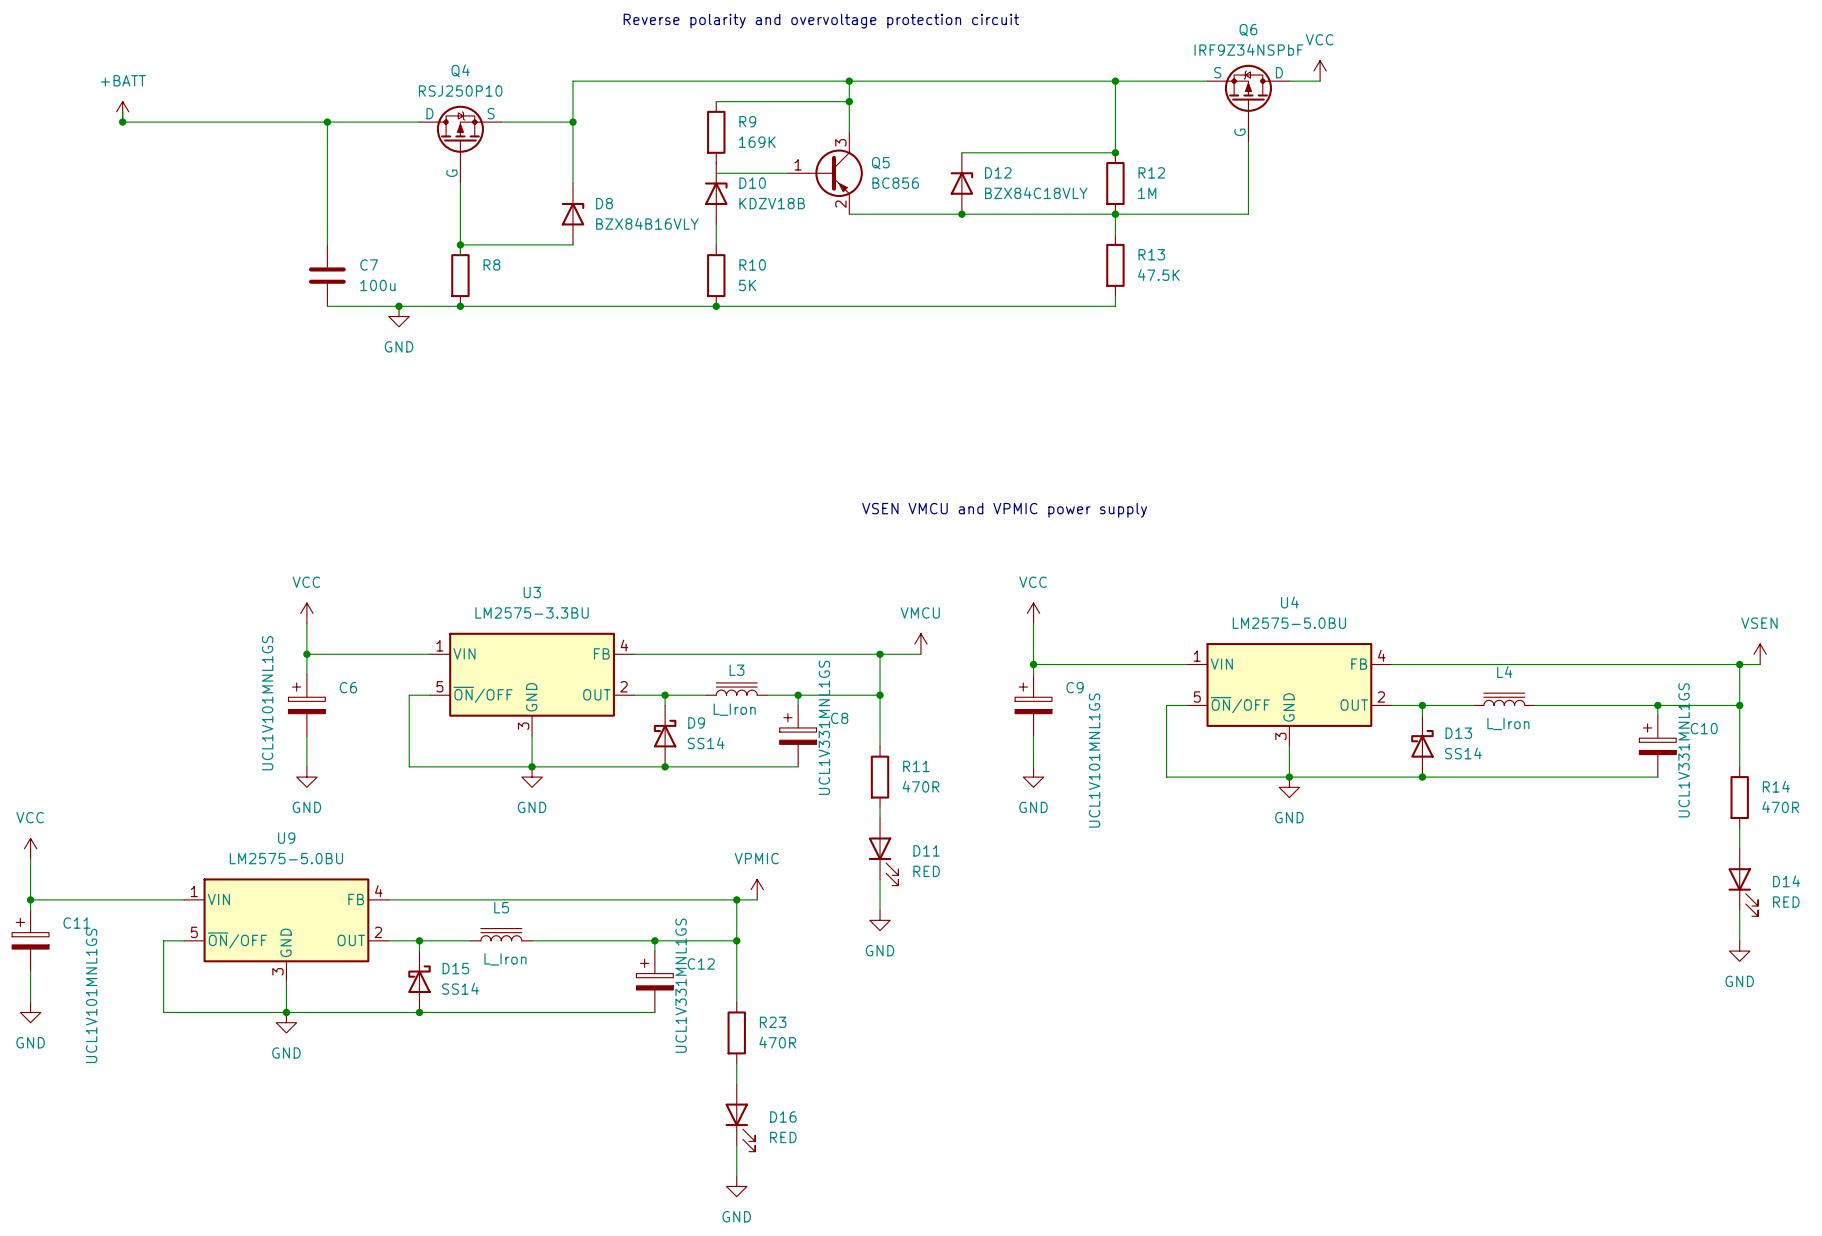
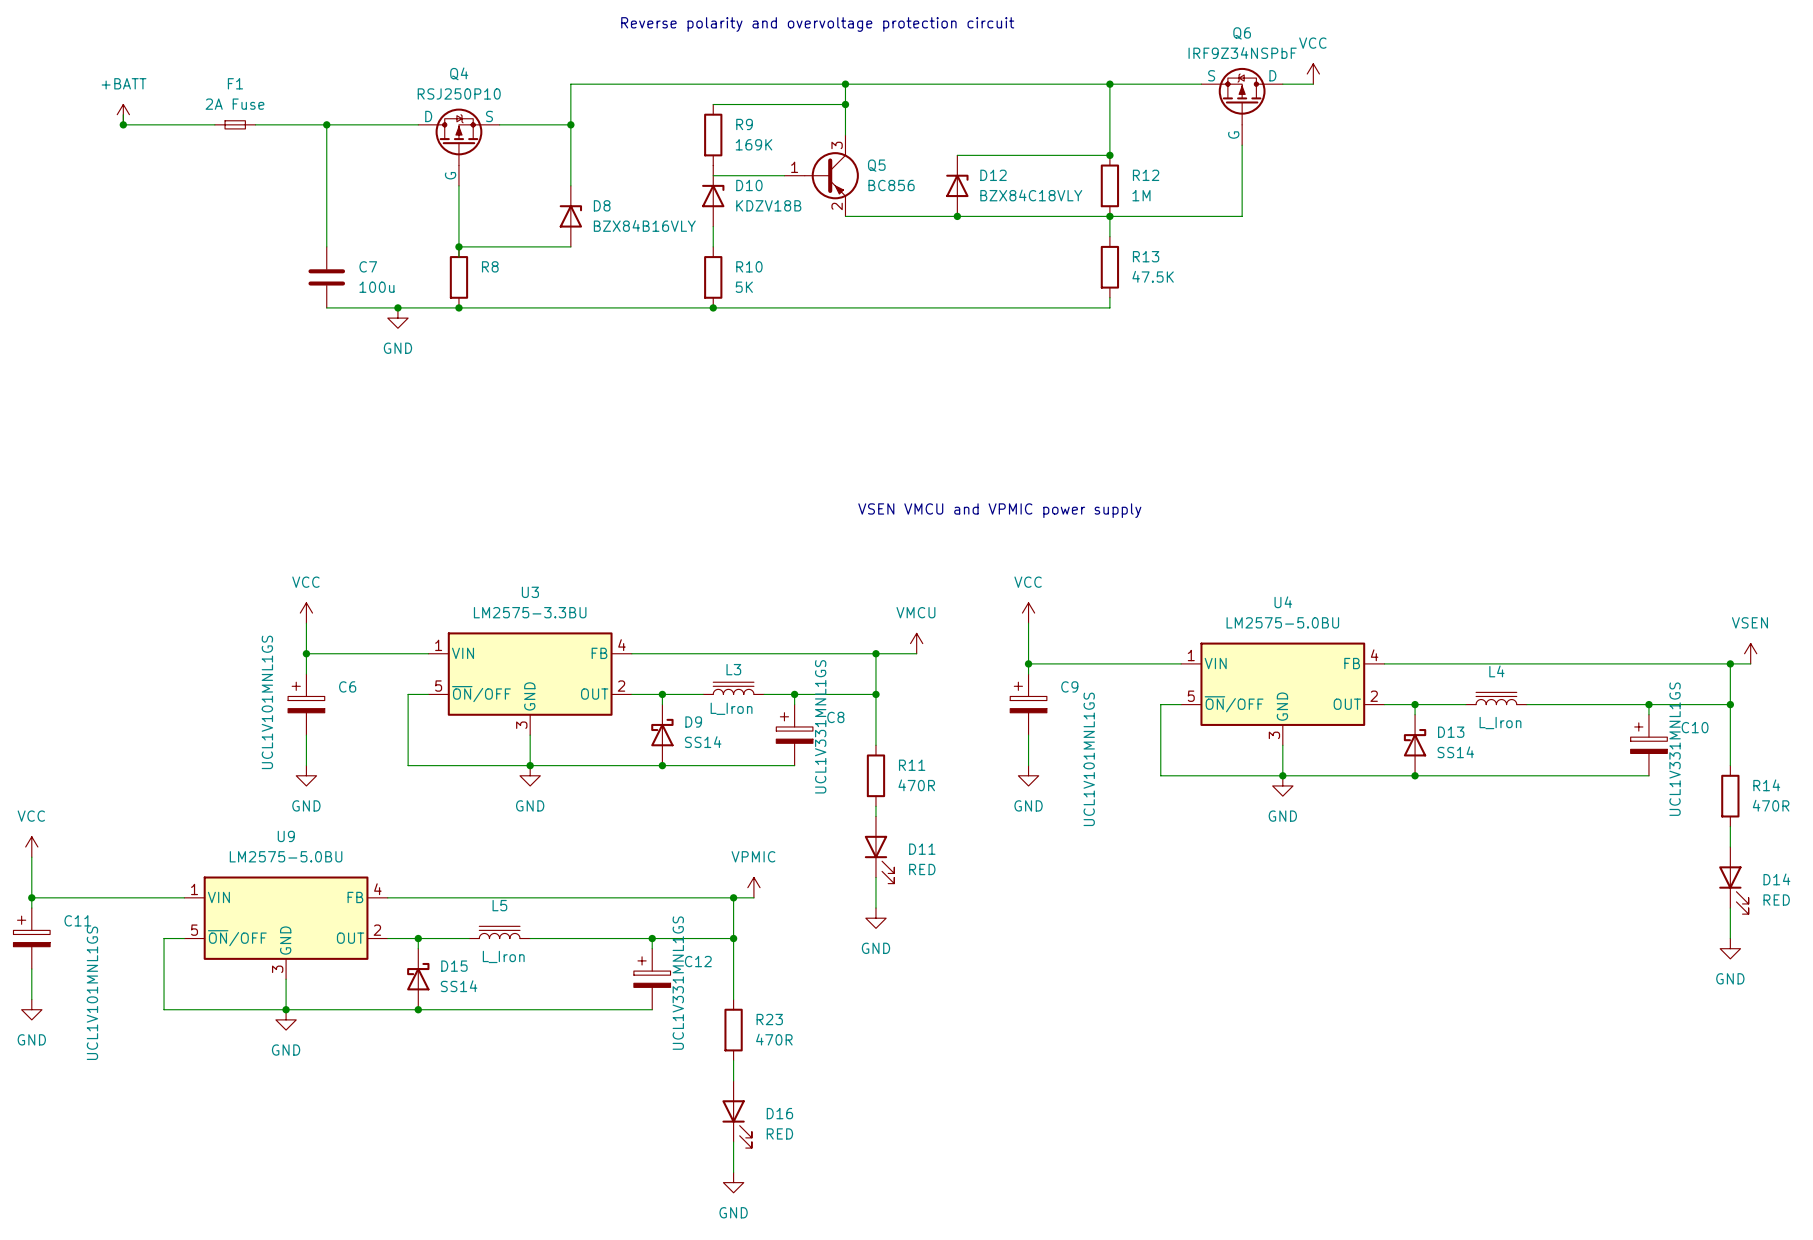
F1: none -> 2A Fuse (235, 124)

